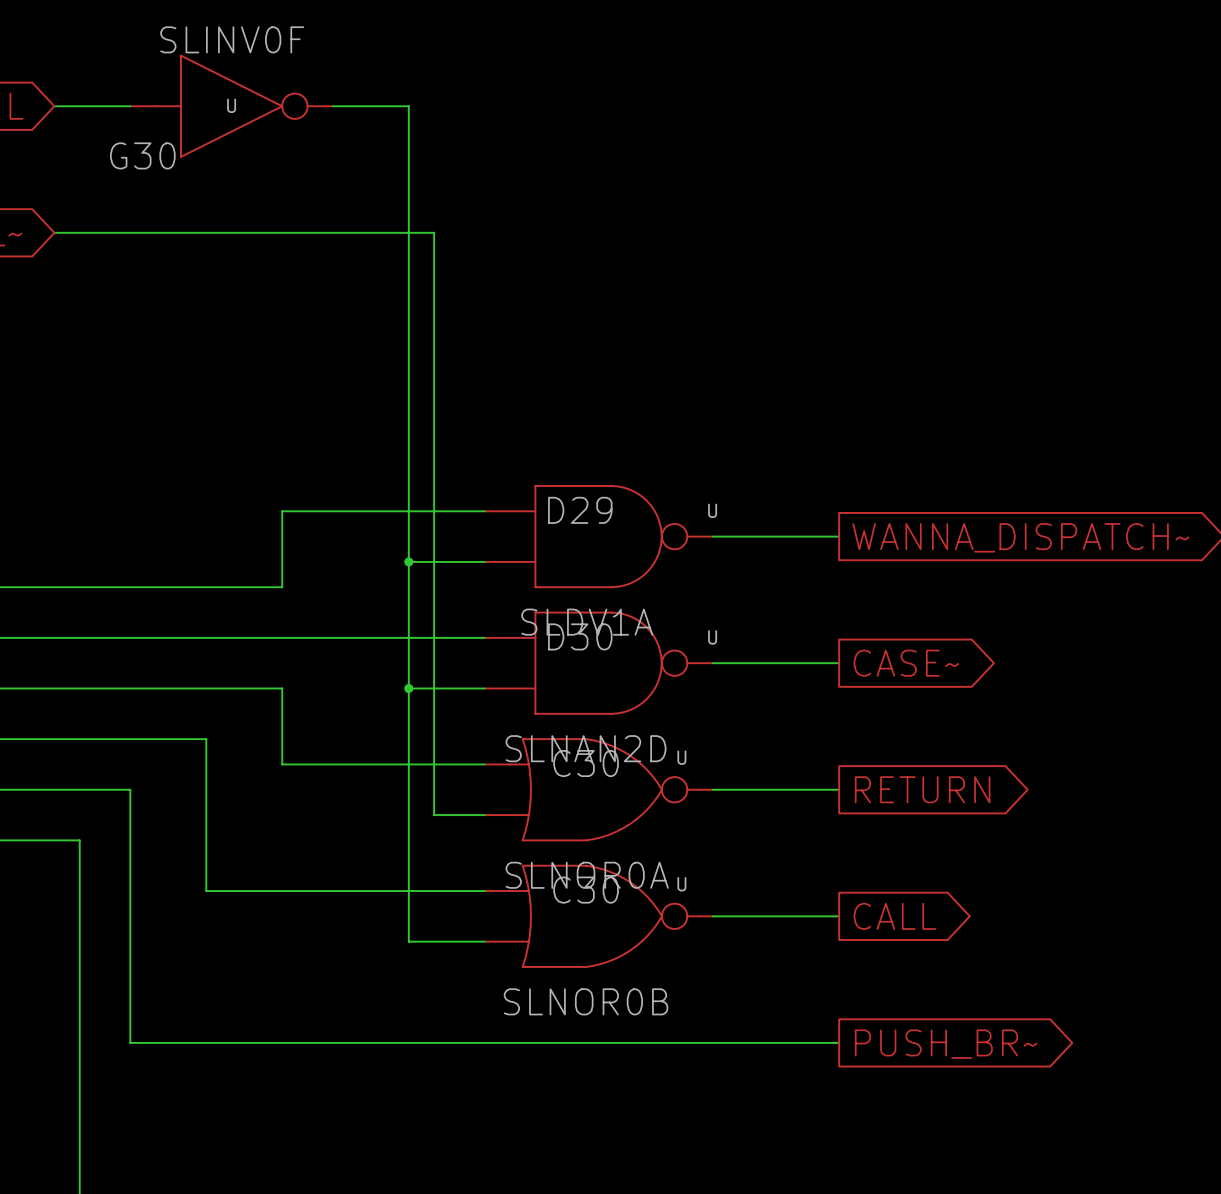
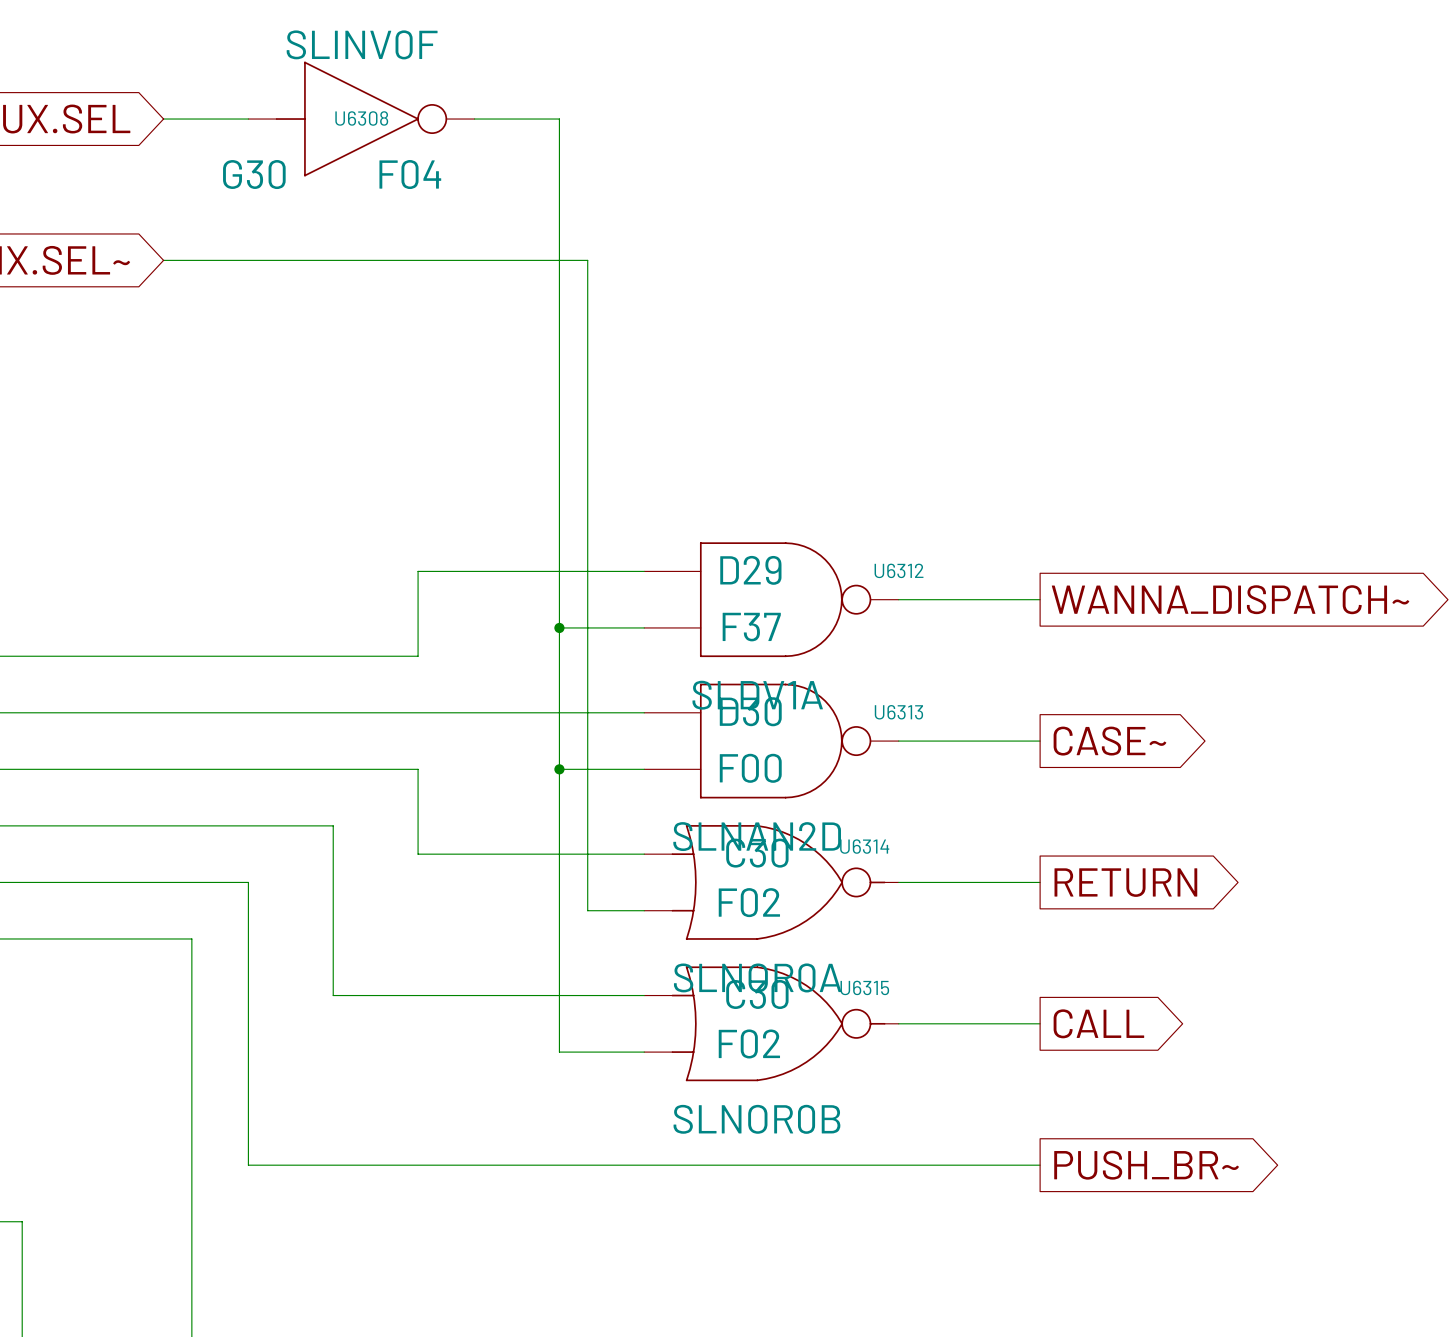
U name: U (231, 105) -> U6308 (361, 118)
U value: none -> F04 (410, 174)
U name: U (712, 510) -> U6312 (899, 570)
U value: none -> F37 (751, 627)
U name: U (712, 637) -> U6313 (898, 712)
U value: none -> F00 (750, 768)
U name: U (681, 757) -> U6314 (864, 846)
U value: none -> F02 (749, 902)
U name: U (681, 884) -> U6315 (864, 987)
U value: none -> F02 (749, 1043)

